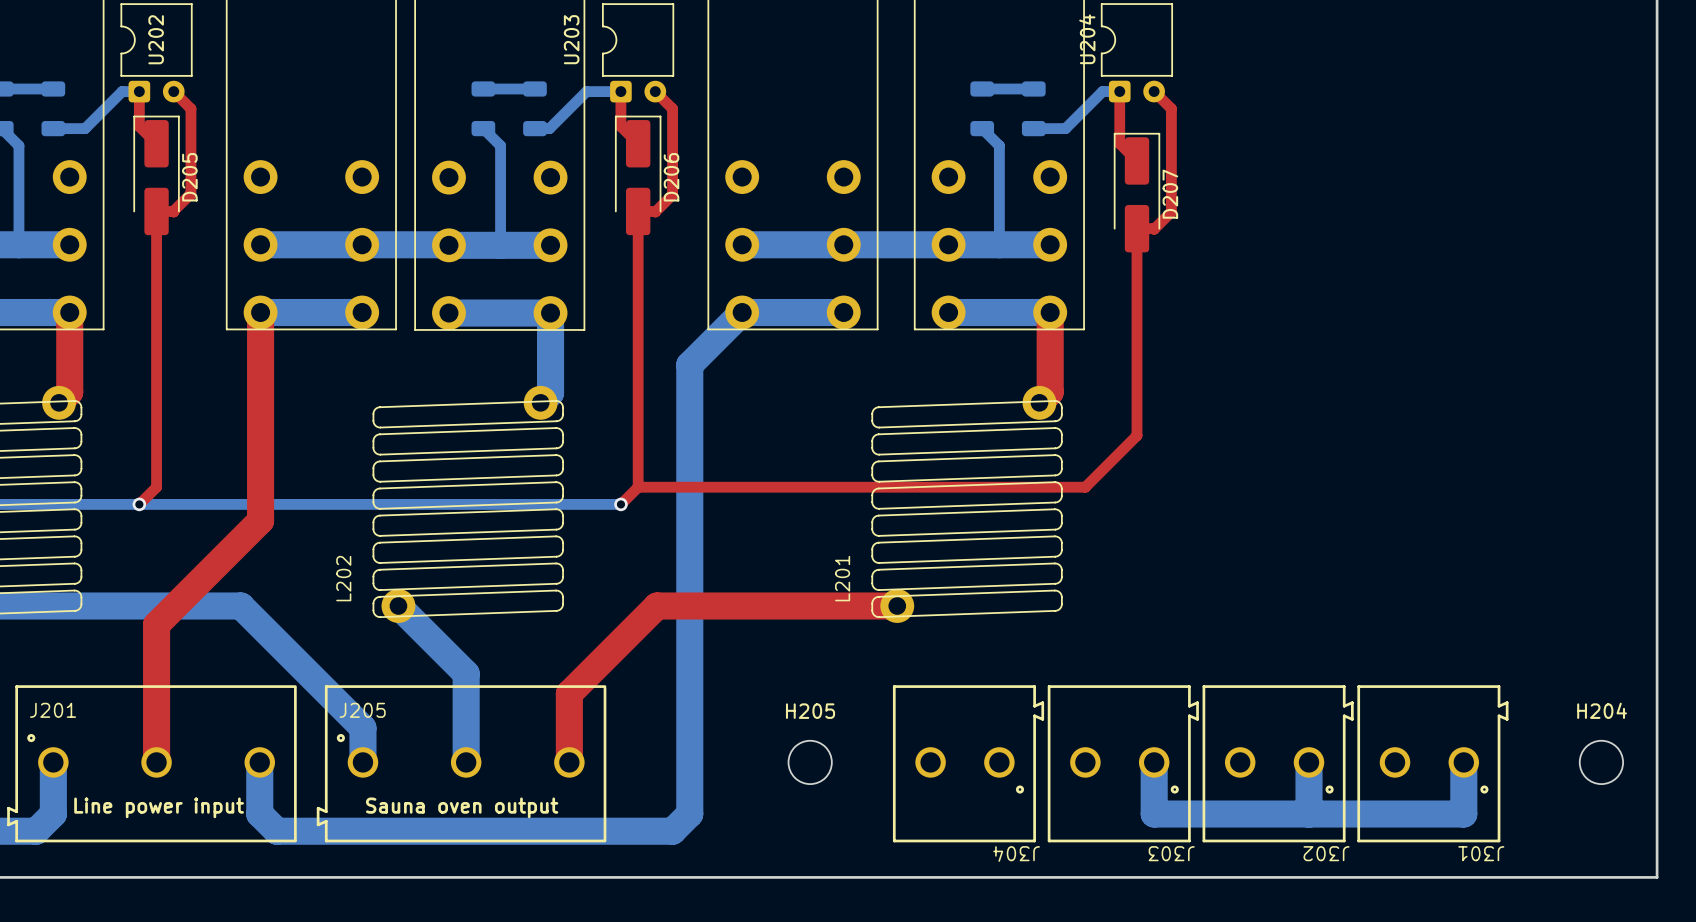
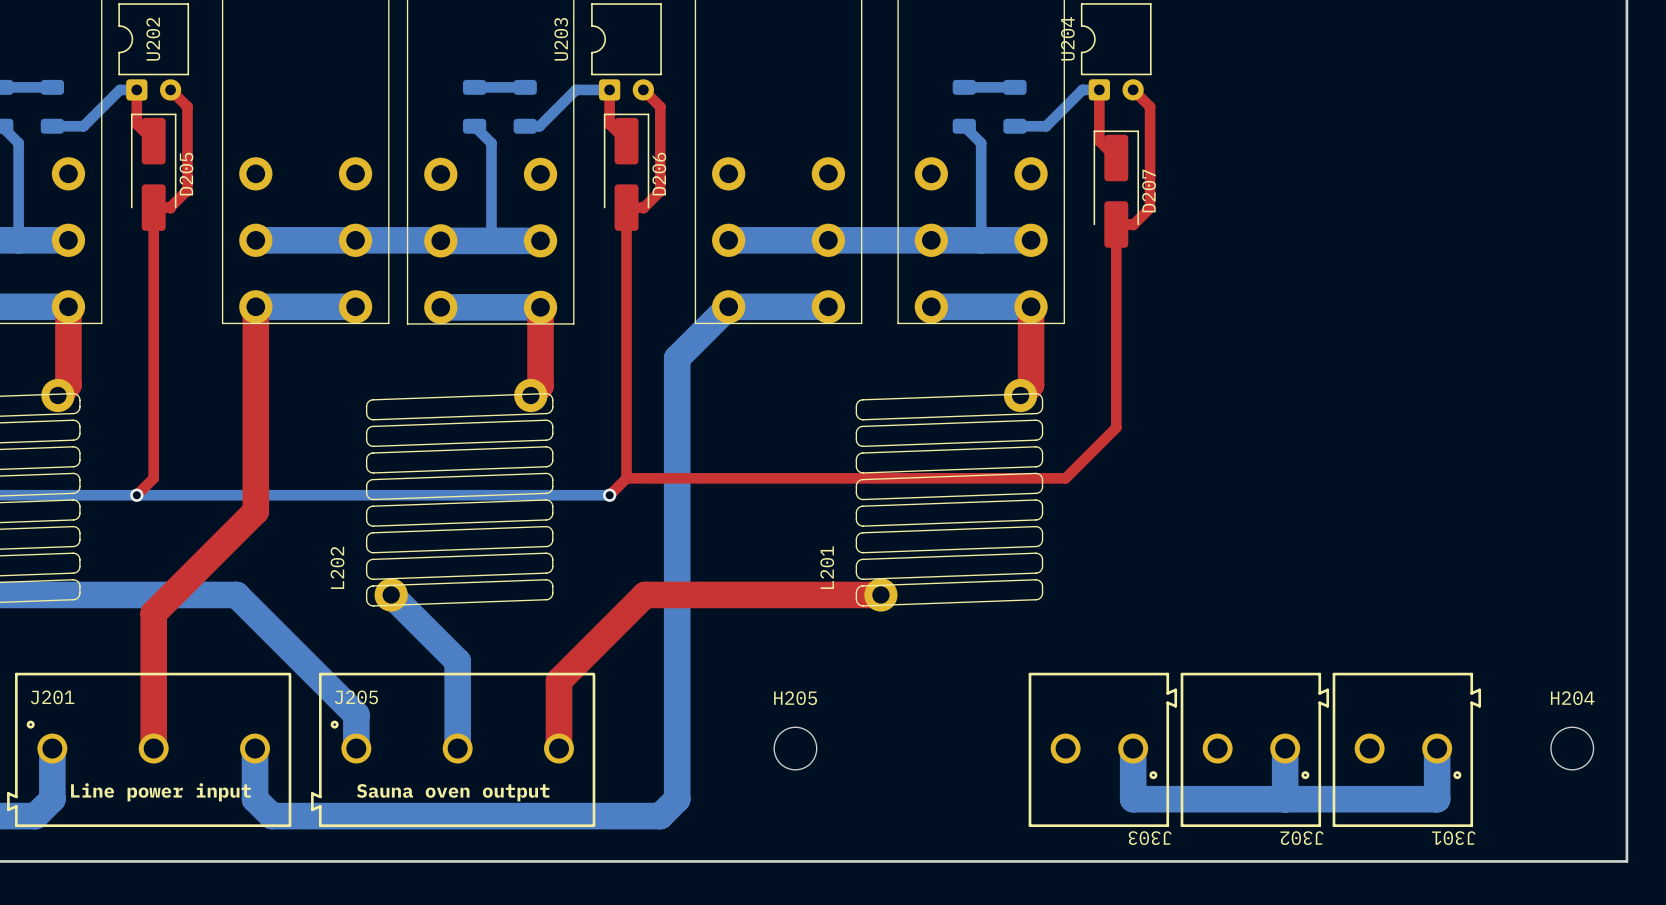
top track: none -> (540, 307) (540, 385) (530, 395)
bottom track: (550, 313) (550, 392) (540, 402) -> none
J304: (968, 763) -> none

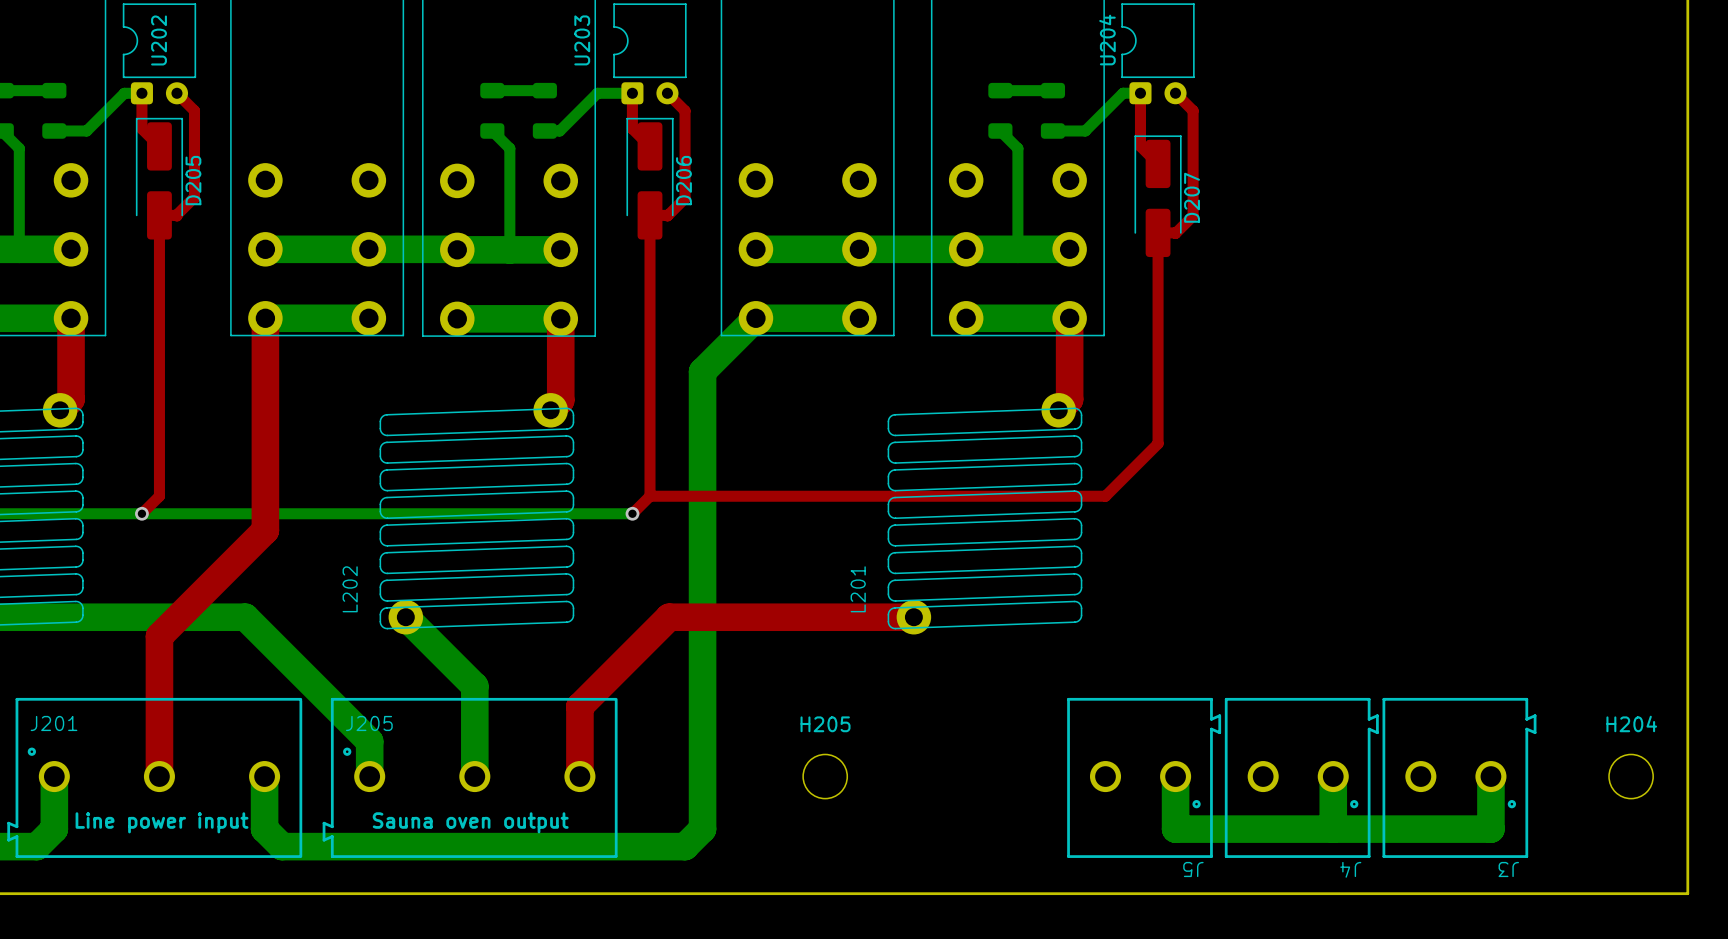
J303 name: J303 (1150, 838) -> J5 (1193, 869)
J302 name: J302 (1301, 838) -> J4 (1350, 869)
J301 name: J301 (1453, 838) -> J3 (1508, 869)

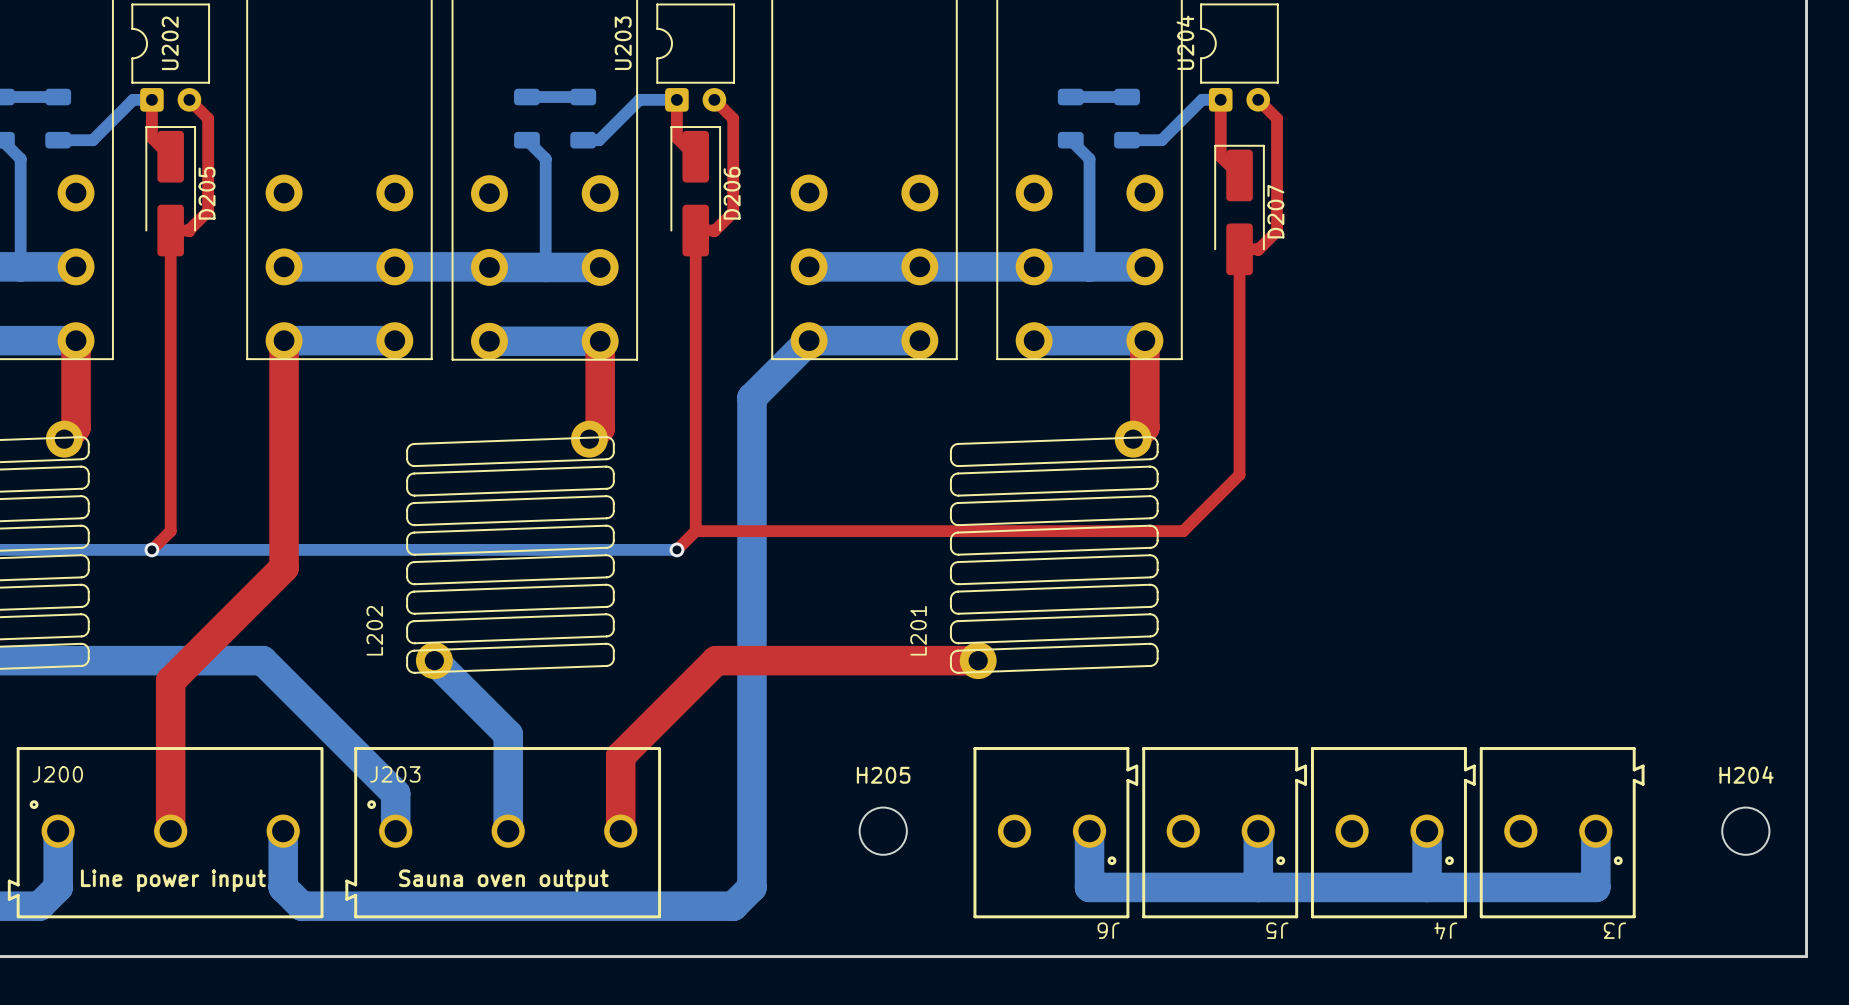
J201 name: J201 (54, 723) -> J200 (57, 774)
J205 name: J205 (369, 723) -> J203 (395, 774)
bottom track: none -> (1089, 831) (1089, 887) (1258, 887)
J6: none -> (1055, 832)

